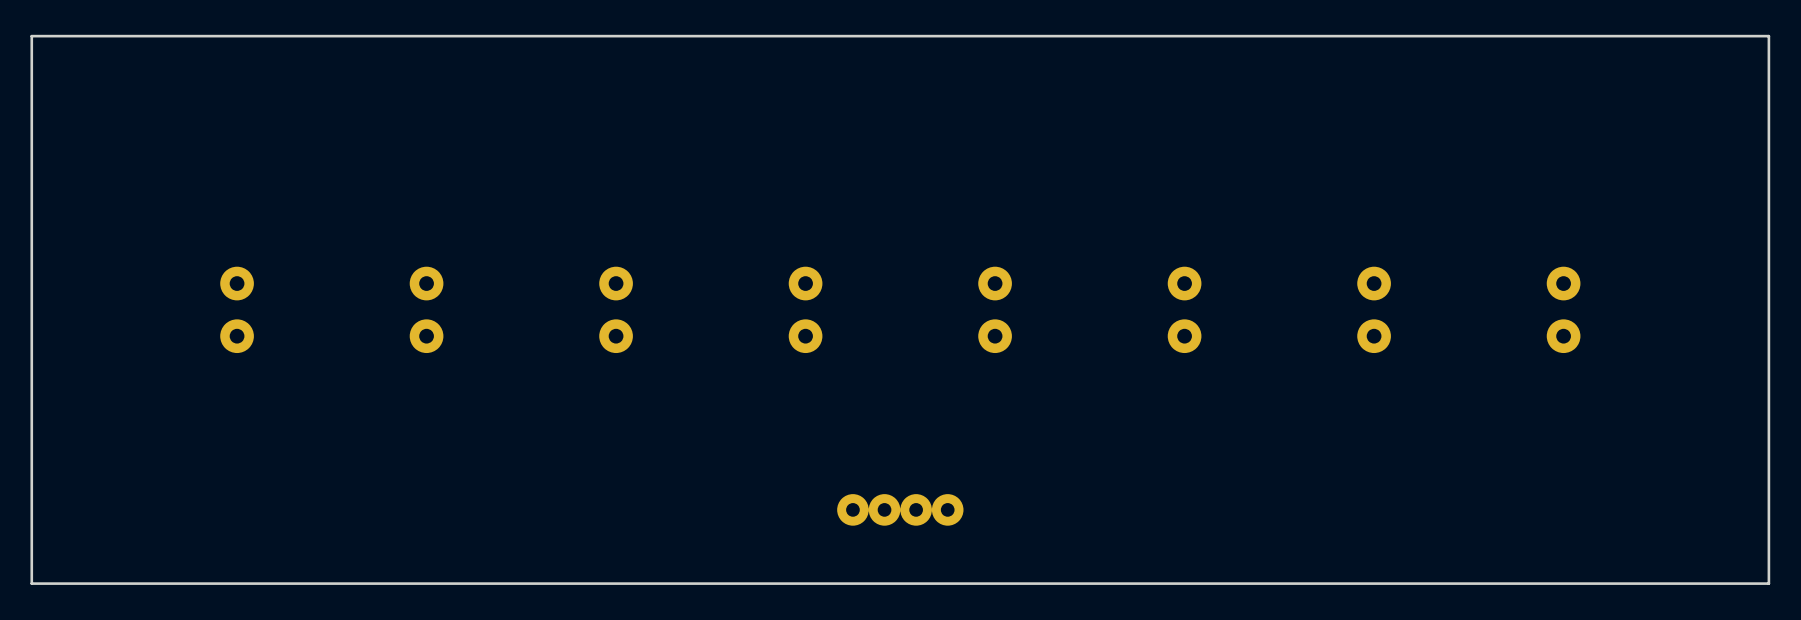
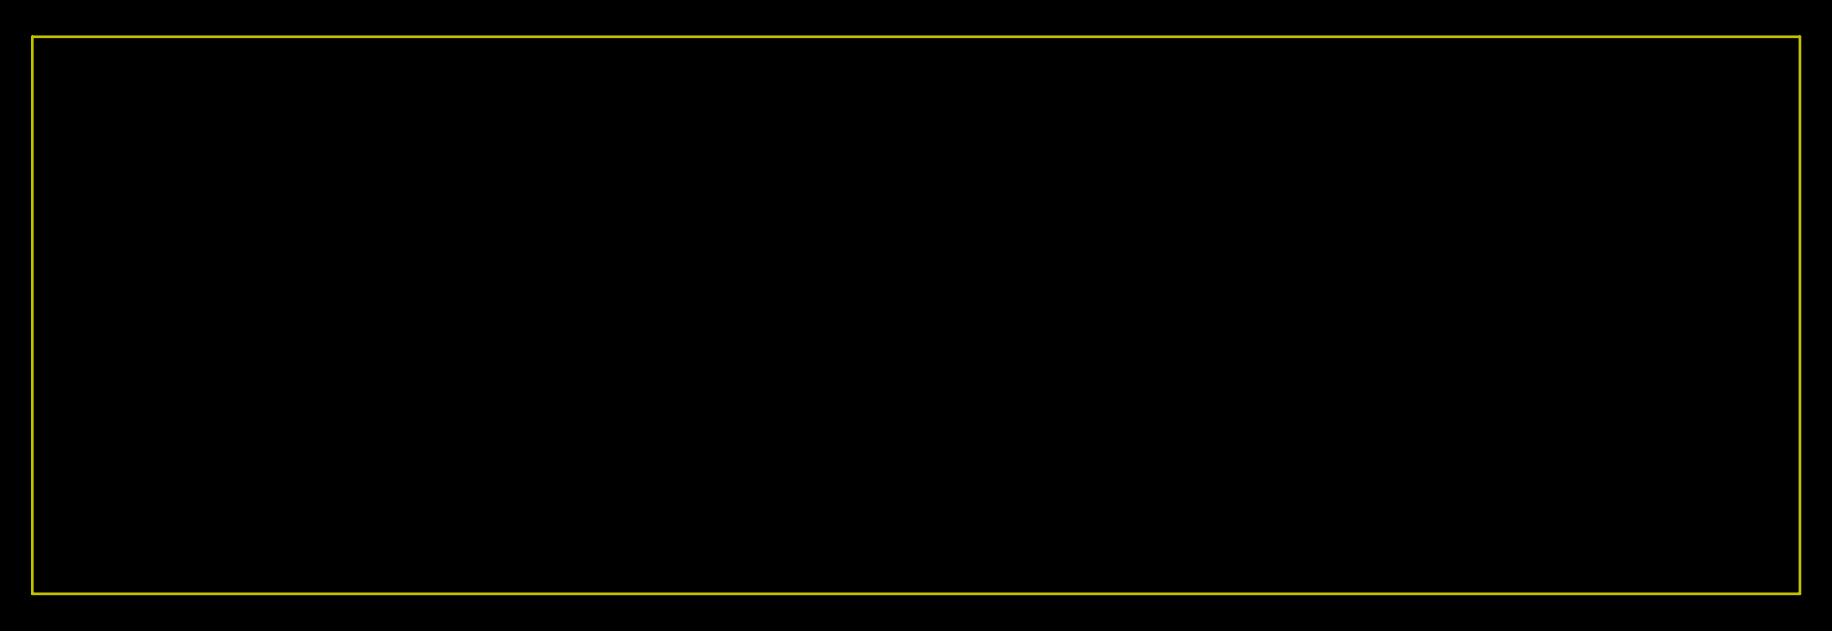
part: (237, 309) -> none
part: (426, 309) -> none
part: (616, 309) -> none
part: (805, 309) -> none
part: (995, 309) -> none
part: (1184, 309) -> none
part: (1374, 309) -> none
part: (1563, 309) -> none
part: (900, 509) -> none

